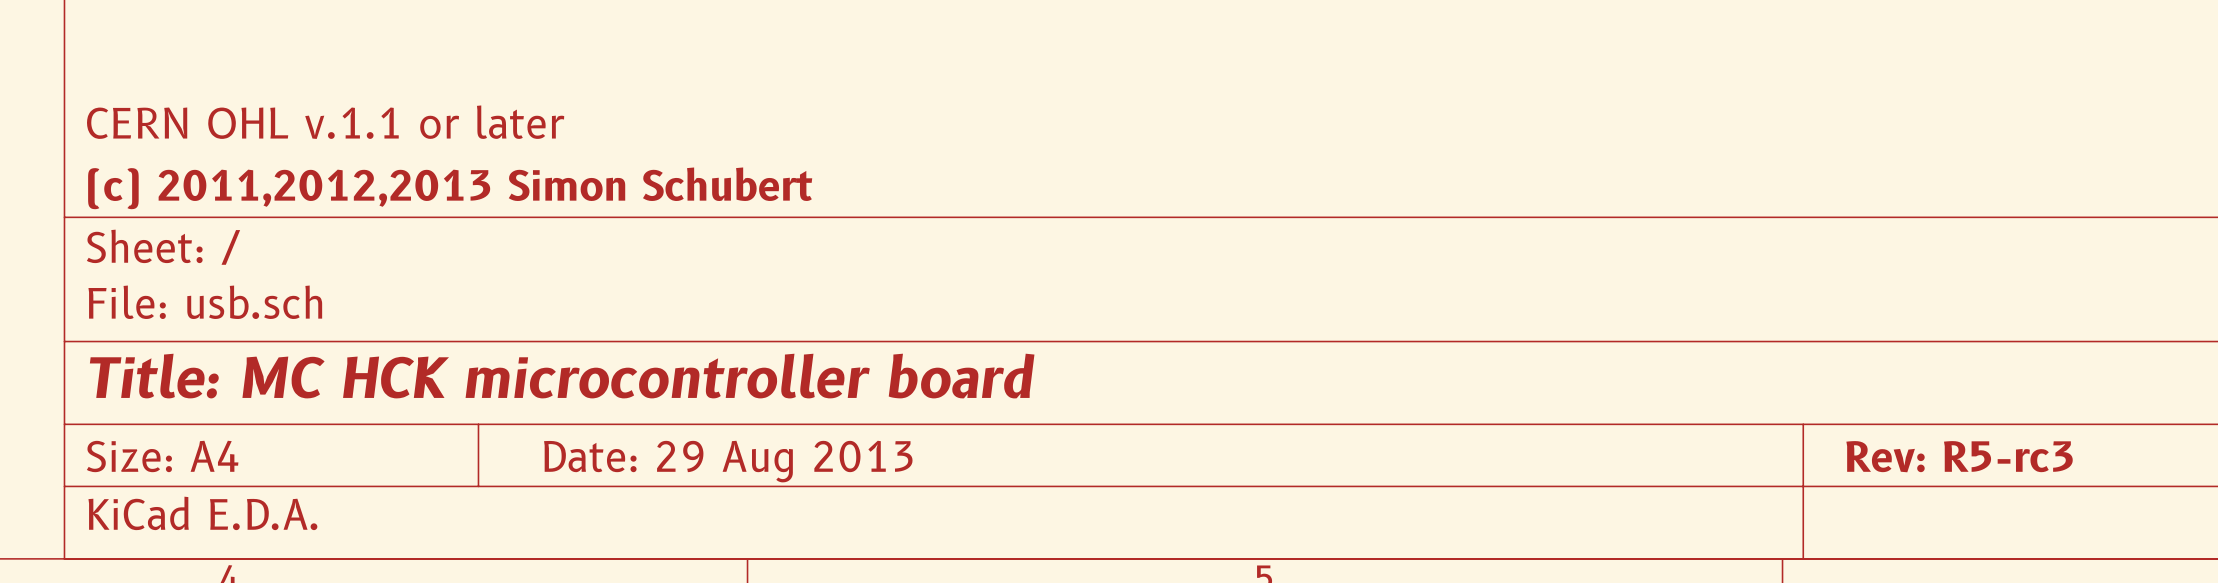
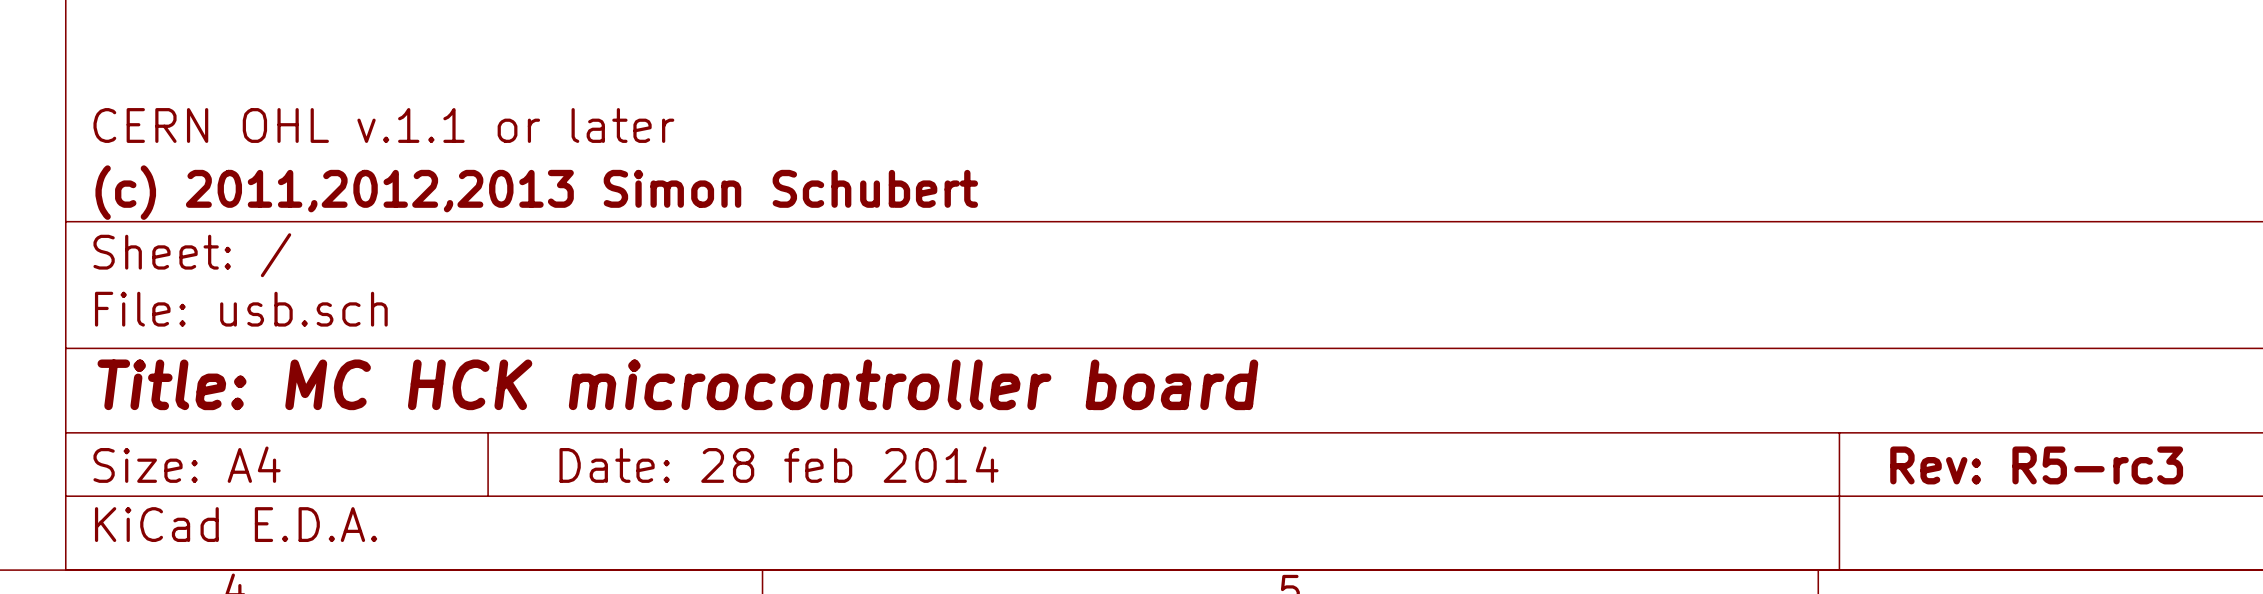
title block: Date: 29 Aug 2013 (728, 461) -> Date: 28 feb 2014 (779, 464)

